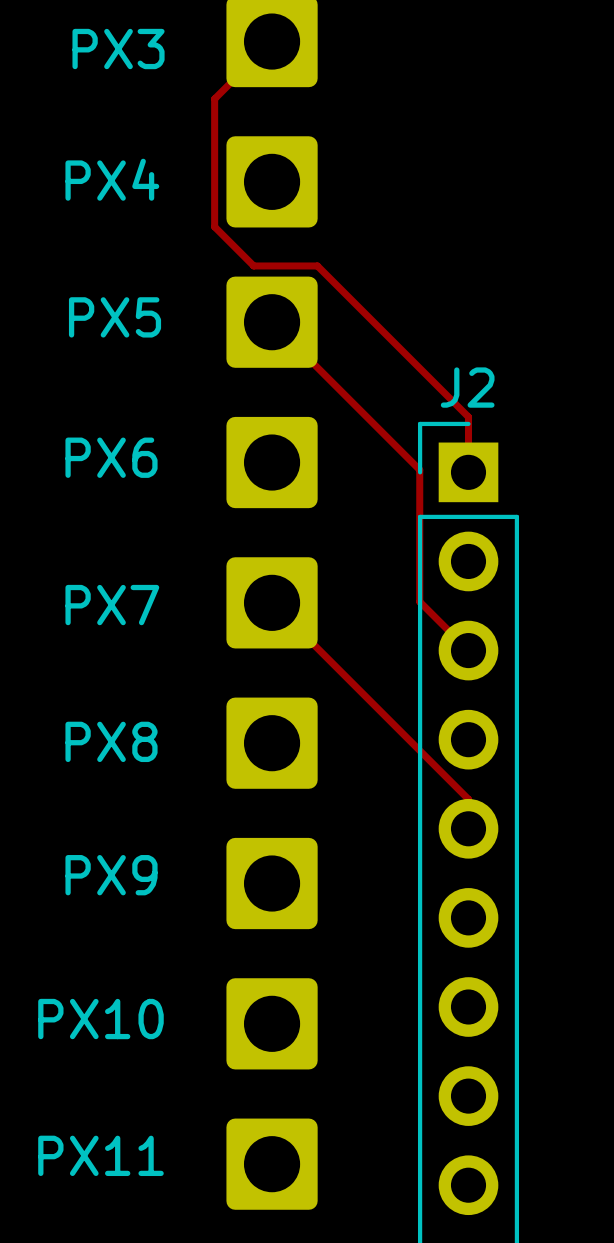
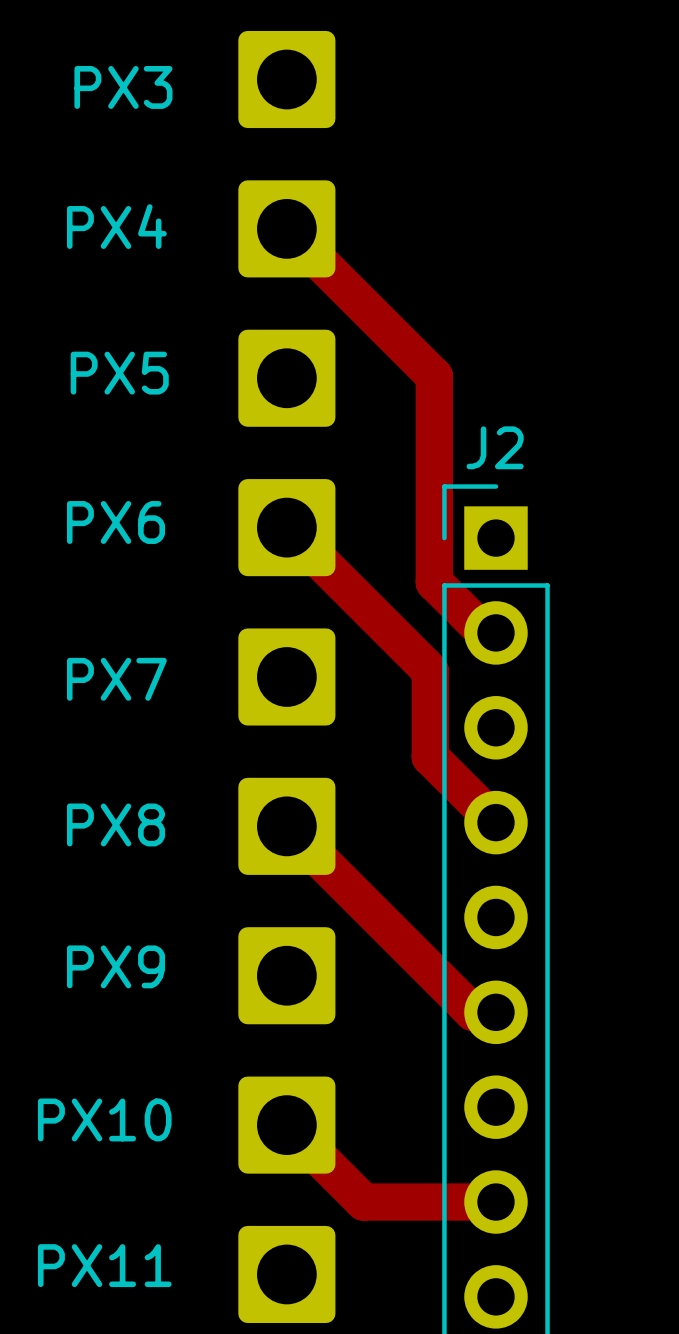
track: (272, 41) (214, 98) (214, 226) (253, 265) (317, 265) (468, 417) (468, 472) -> none
track: none -> (286, 228) (434, 376) (434, 582) (485, 632) (495, 632)
track: (272, 322) (419, 469) (419, 601) (468, 650) -> none
track: none -> (286, 527) (430, 671) (430, 756) (495, 822)
track: (272, 602) (468, 799) (468, 828) -> none
track: none -> (286, 826) (472, 1012) (495, 1012)
track: none -> (286, 1125) (363, 1202) (495, 1202)

